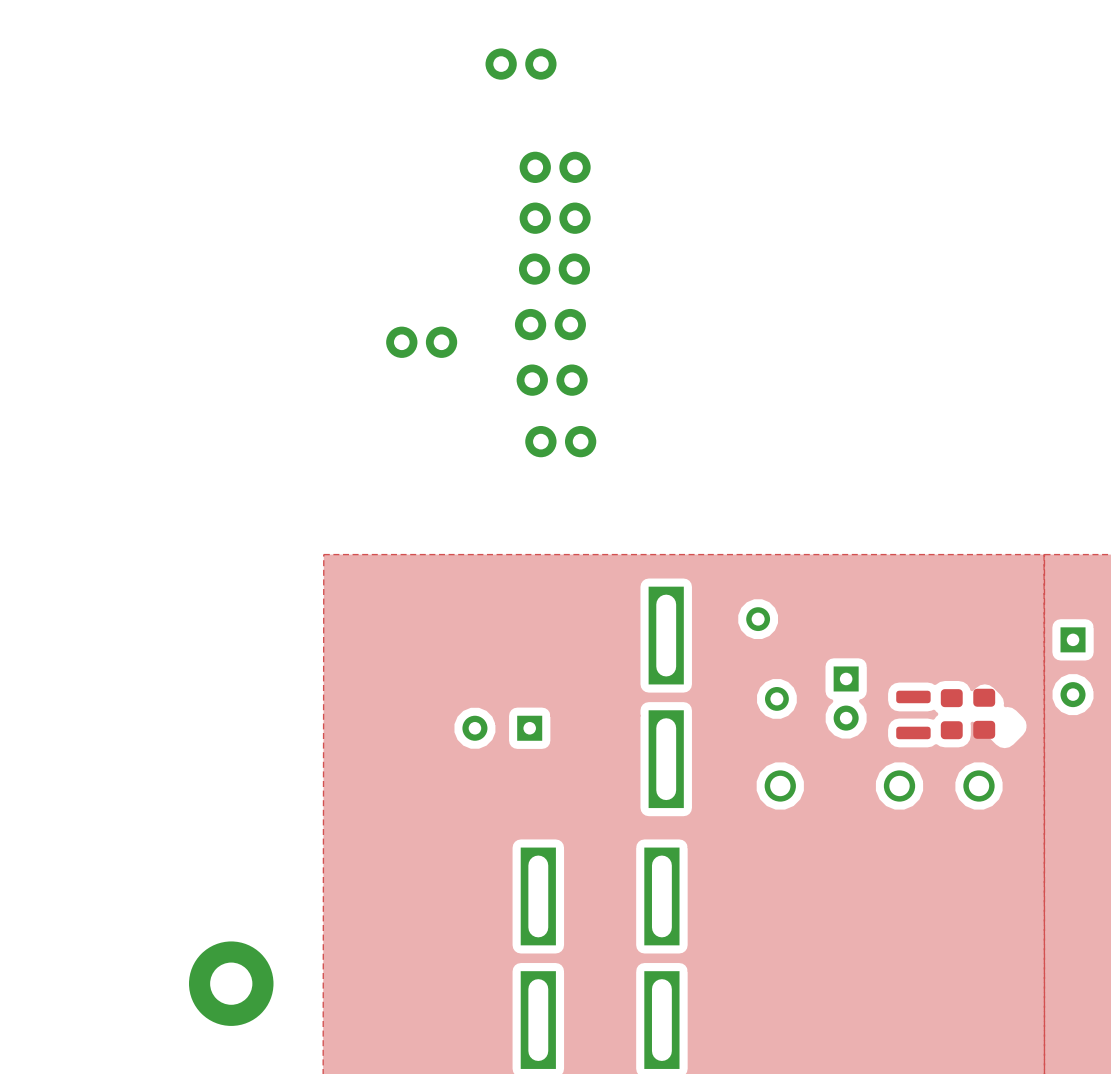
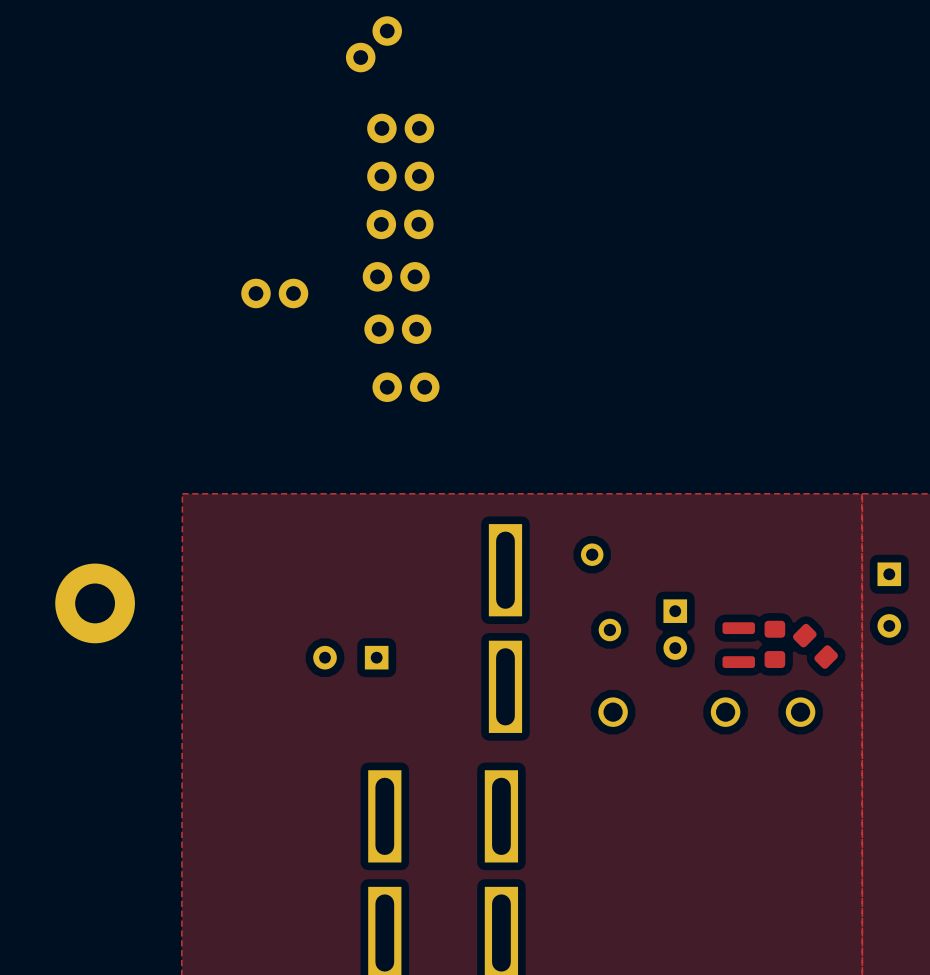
part rotation: 0° (521, 64) -> 45° counterclockwise (373, 44)
part rotation: 0° (984, 713) -> 45° counterclockwise (815, 646)
part position: (231, 983) -> (95, 603)

